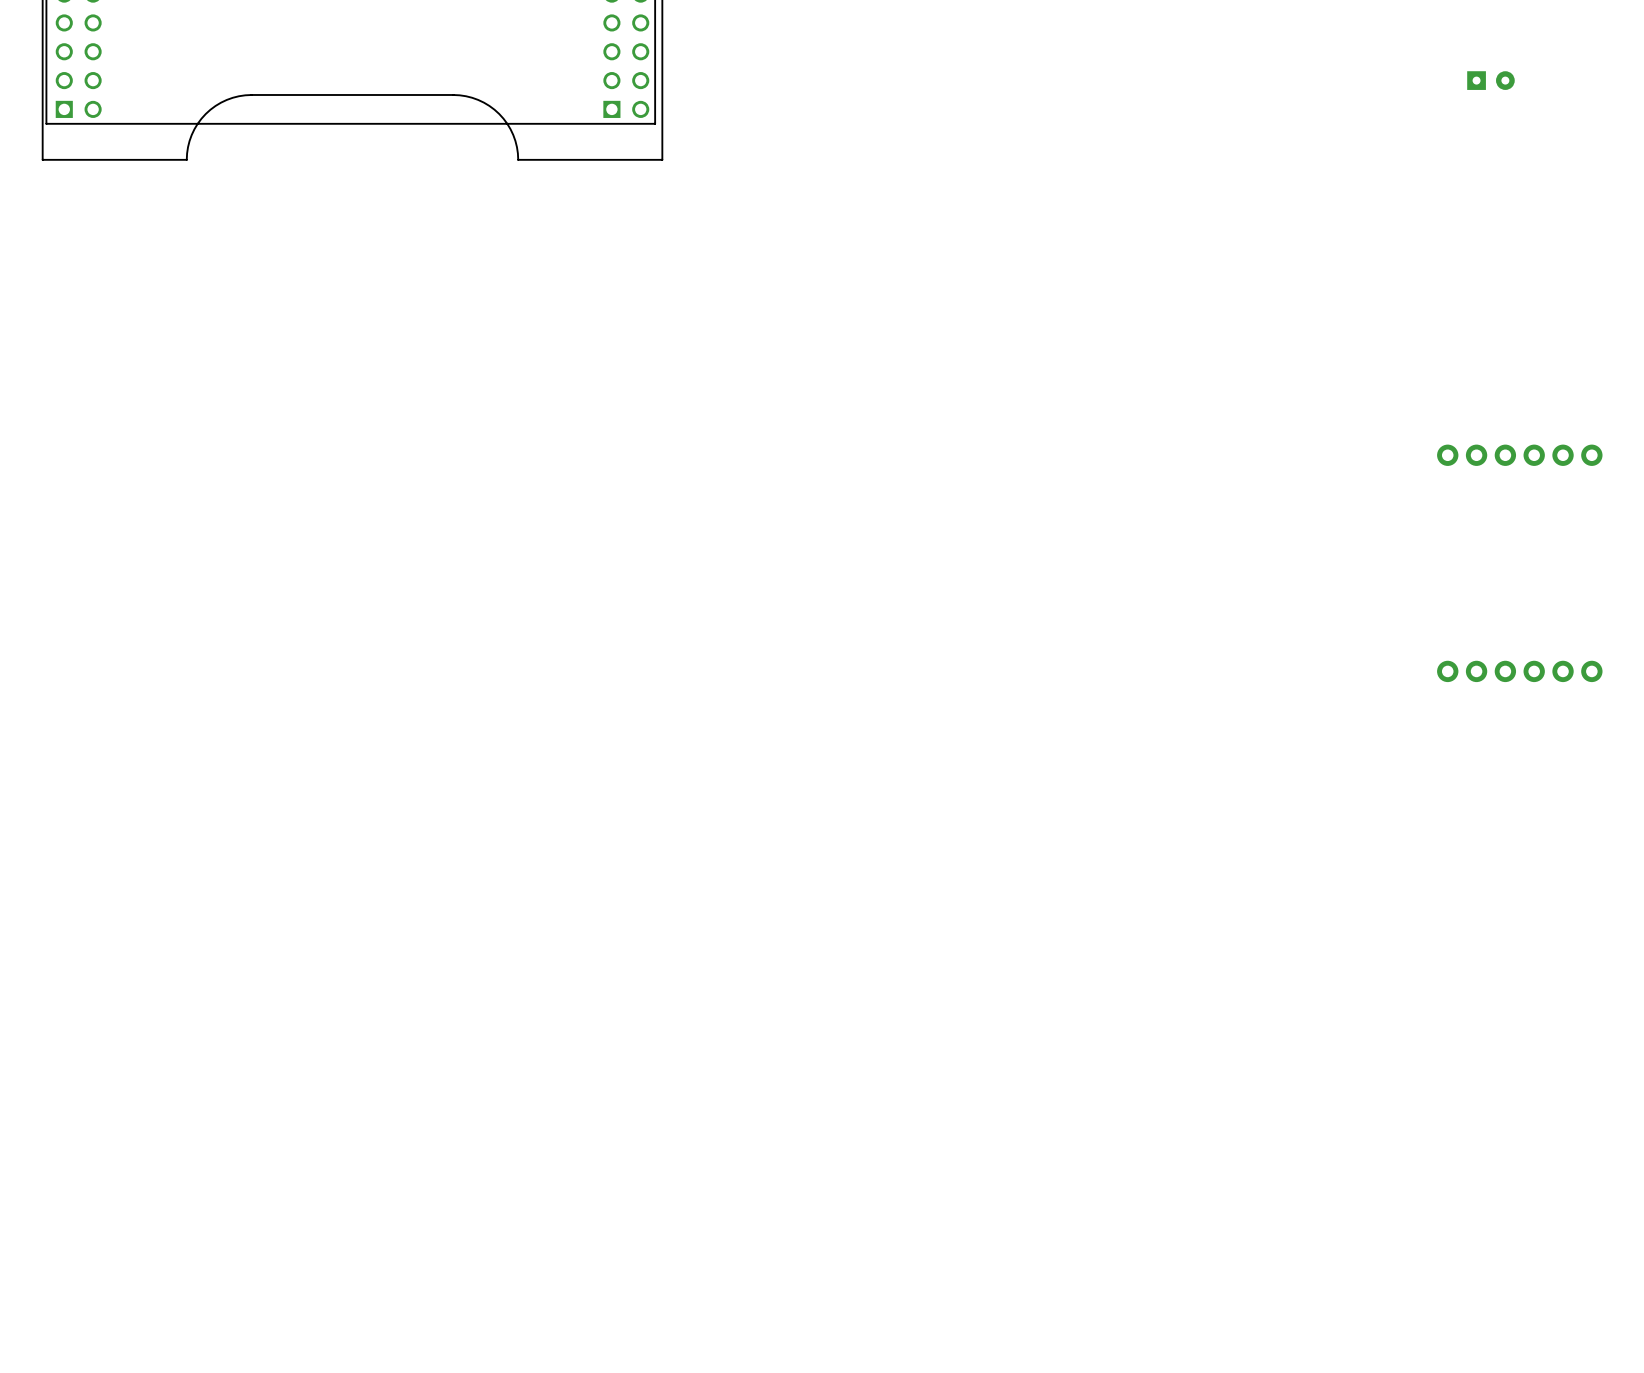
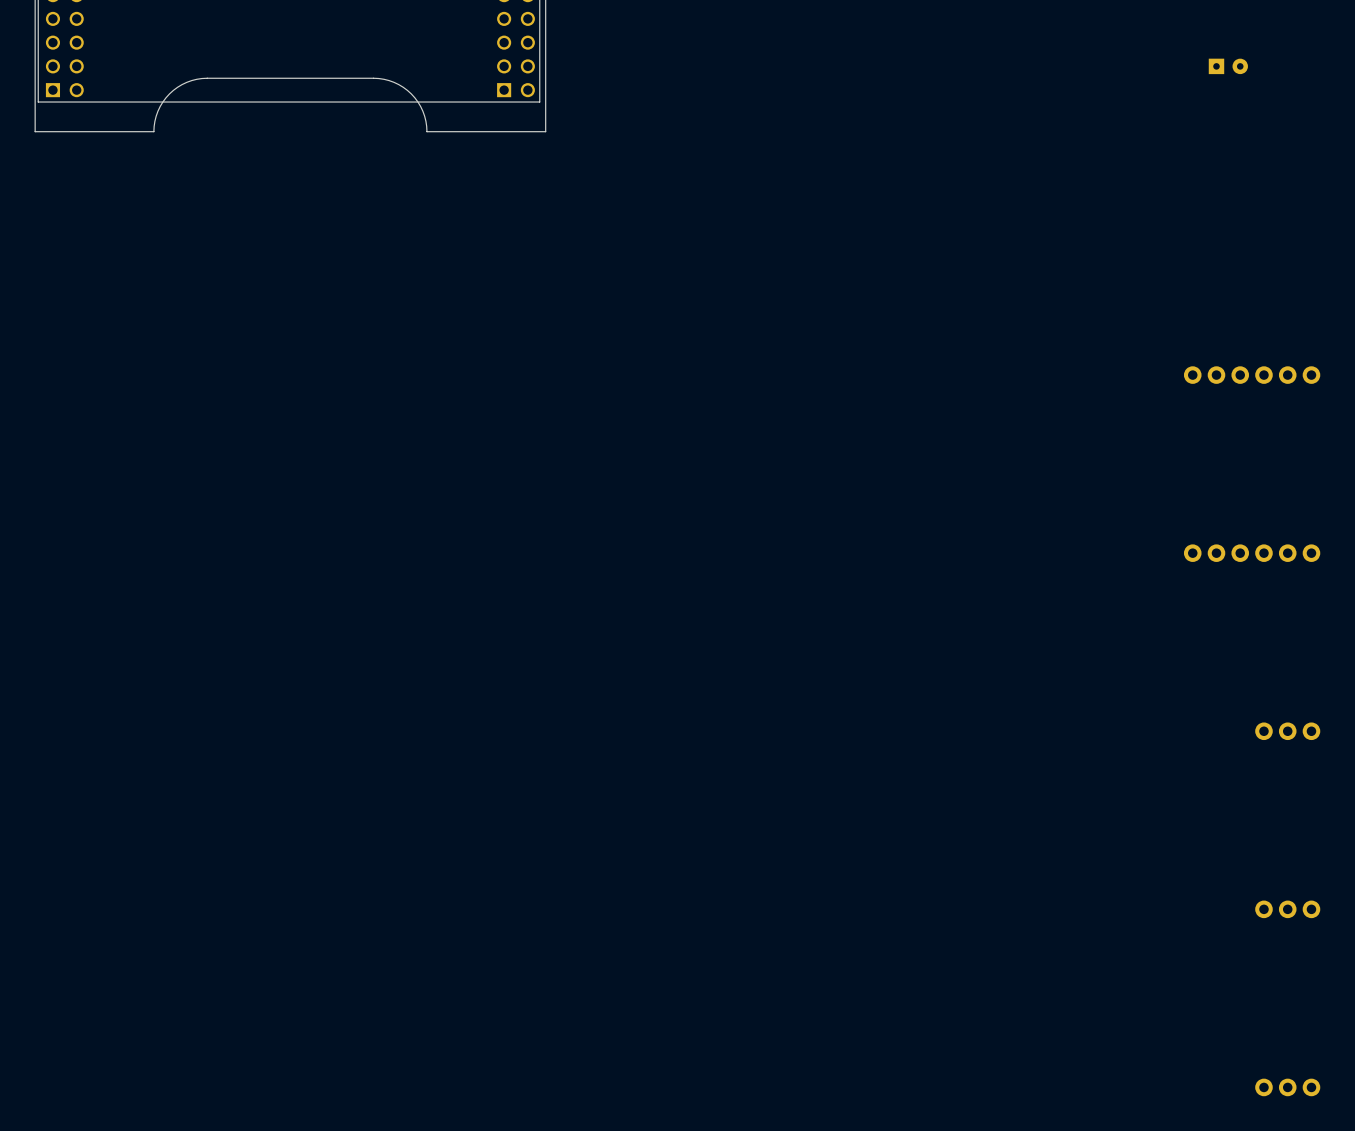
part: none -> (1287, 731)
part: none -> (1287, 909)
part: none -> (1287, 1087)

